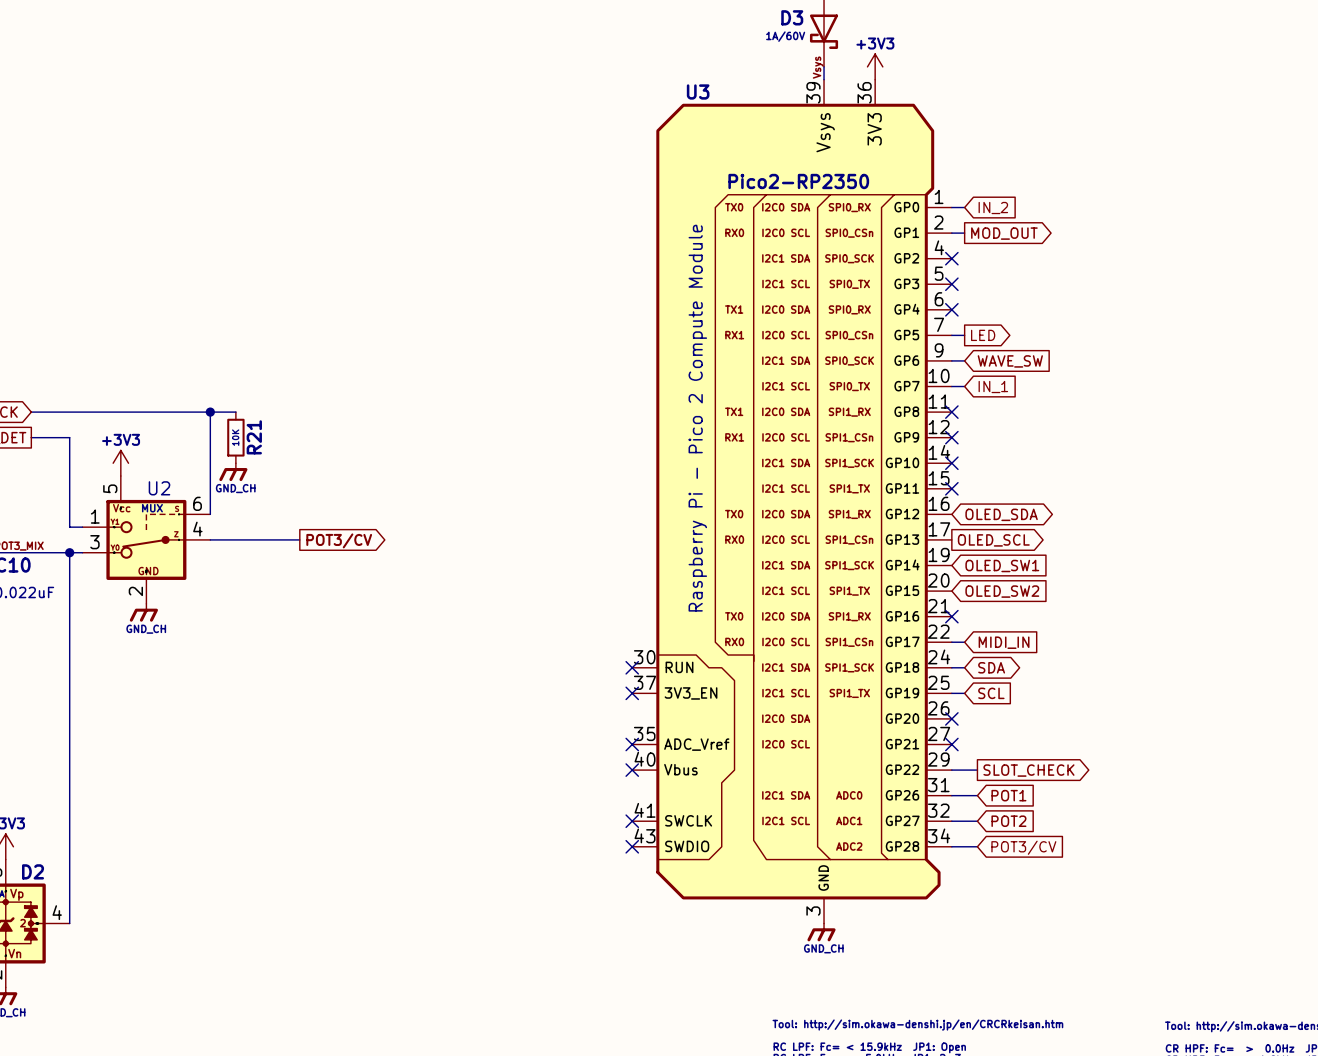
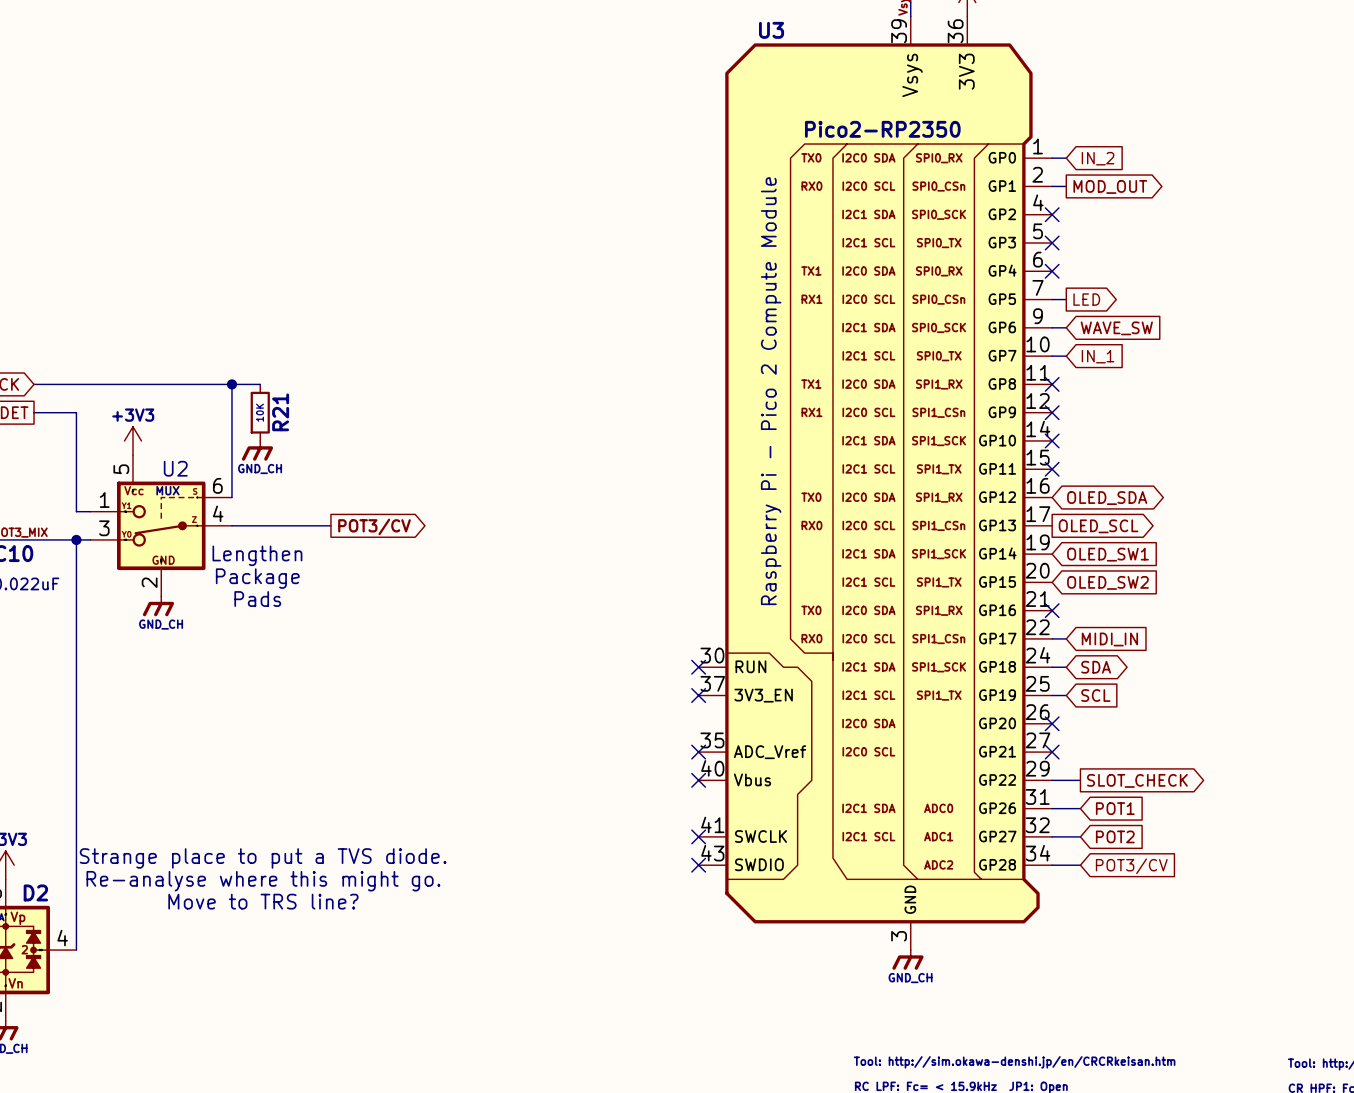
text: none -> Lengthen (257, 555)
text: none -> Package (257, 578)
text: none -> Pads (257, 599)
text: none -> Strange place to put a TVS diode. (263, 858)
text: none -> Re-analyse where this might go. (263, 881)
text: none -> Move to TRS line? (263, 901)

